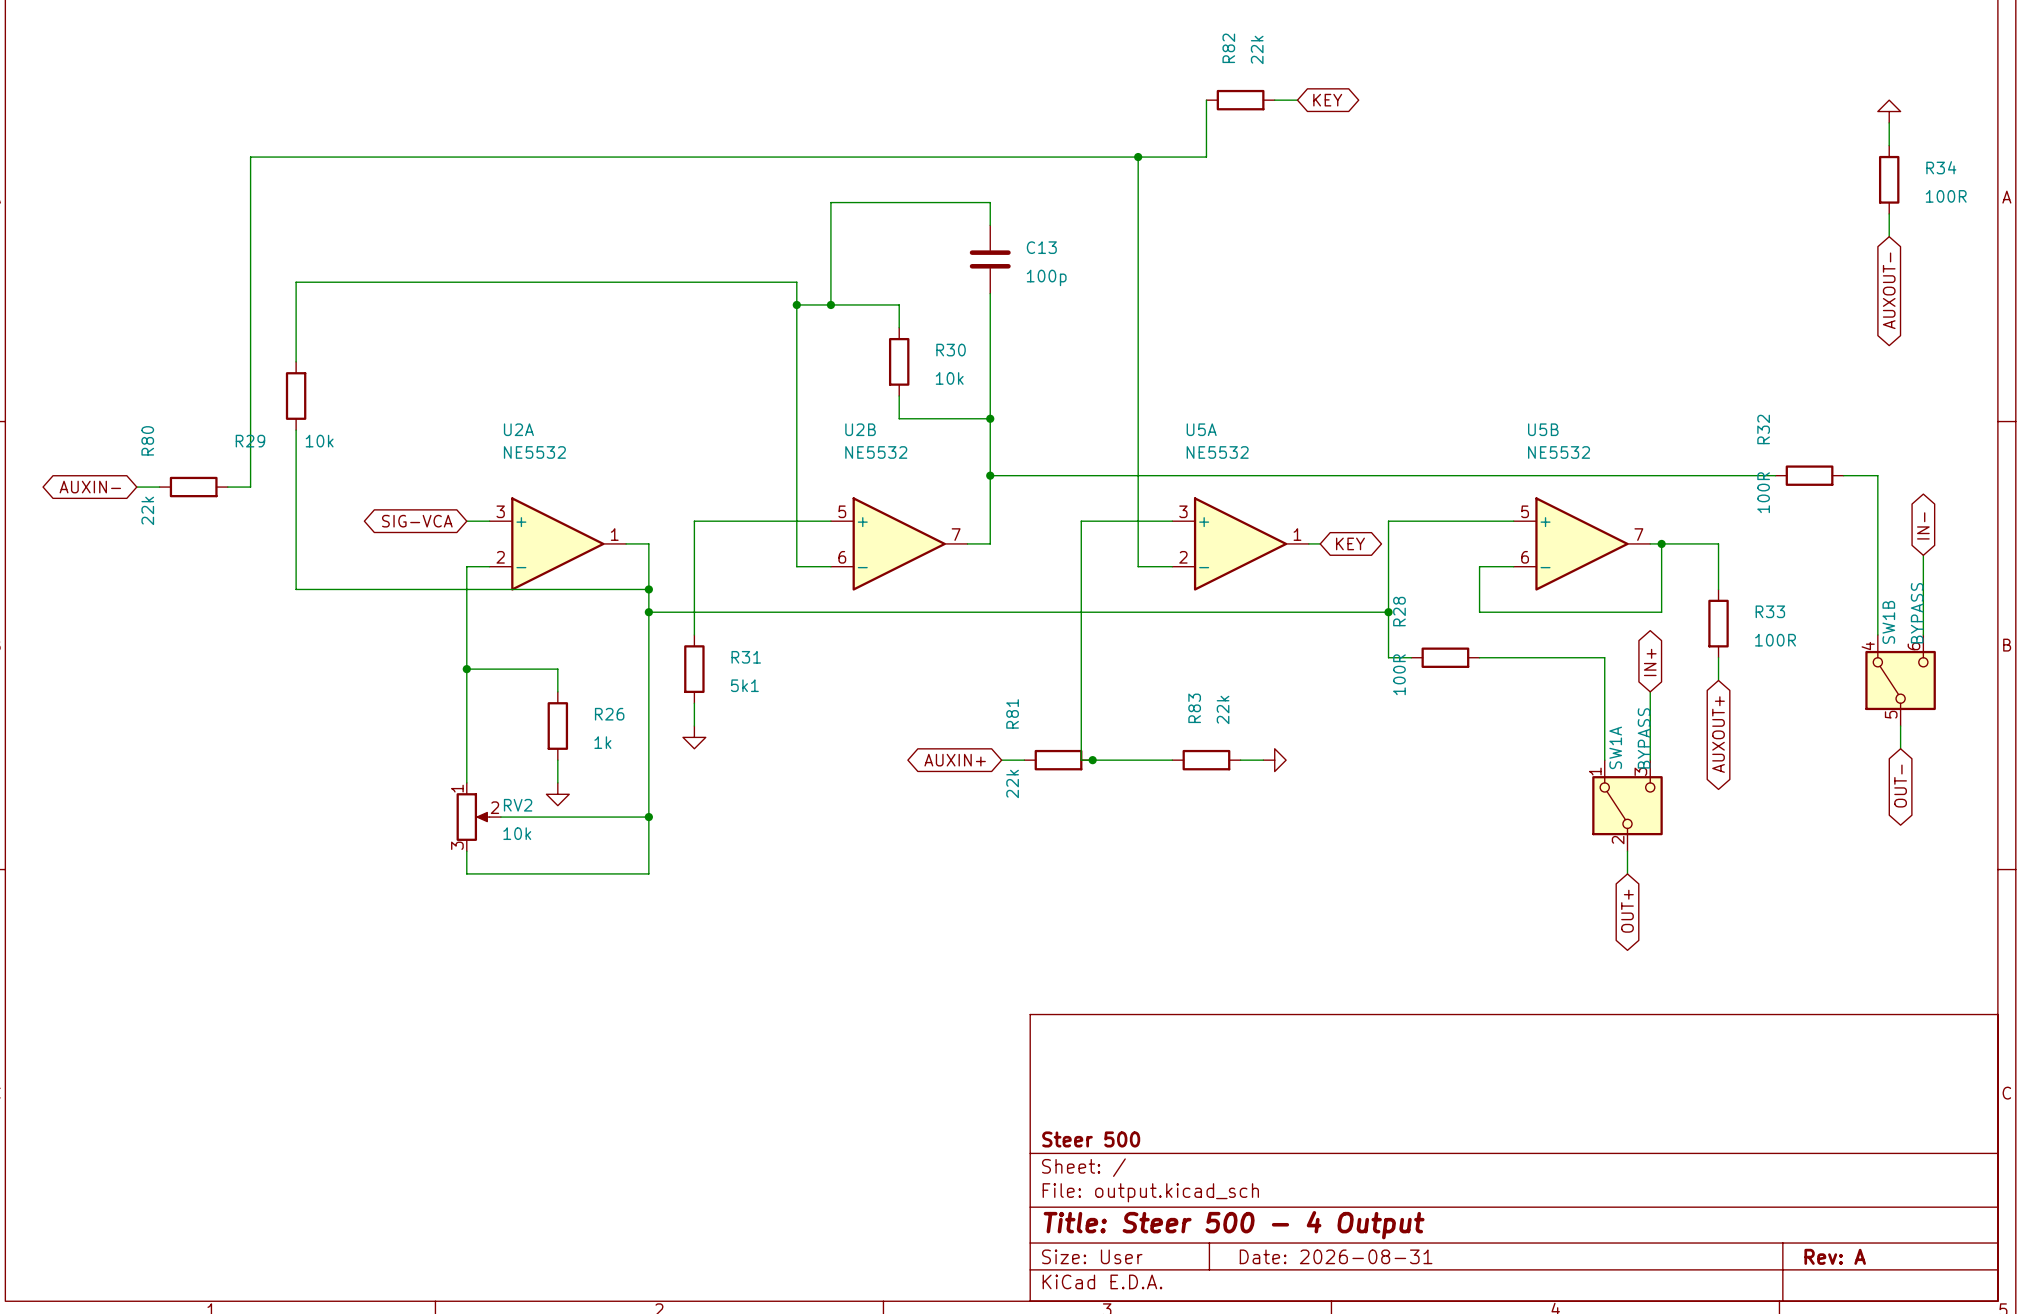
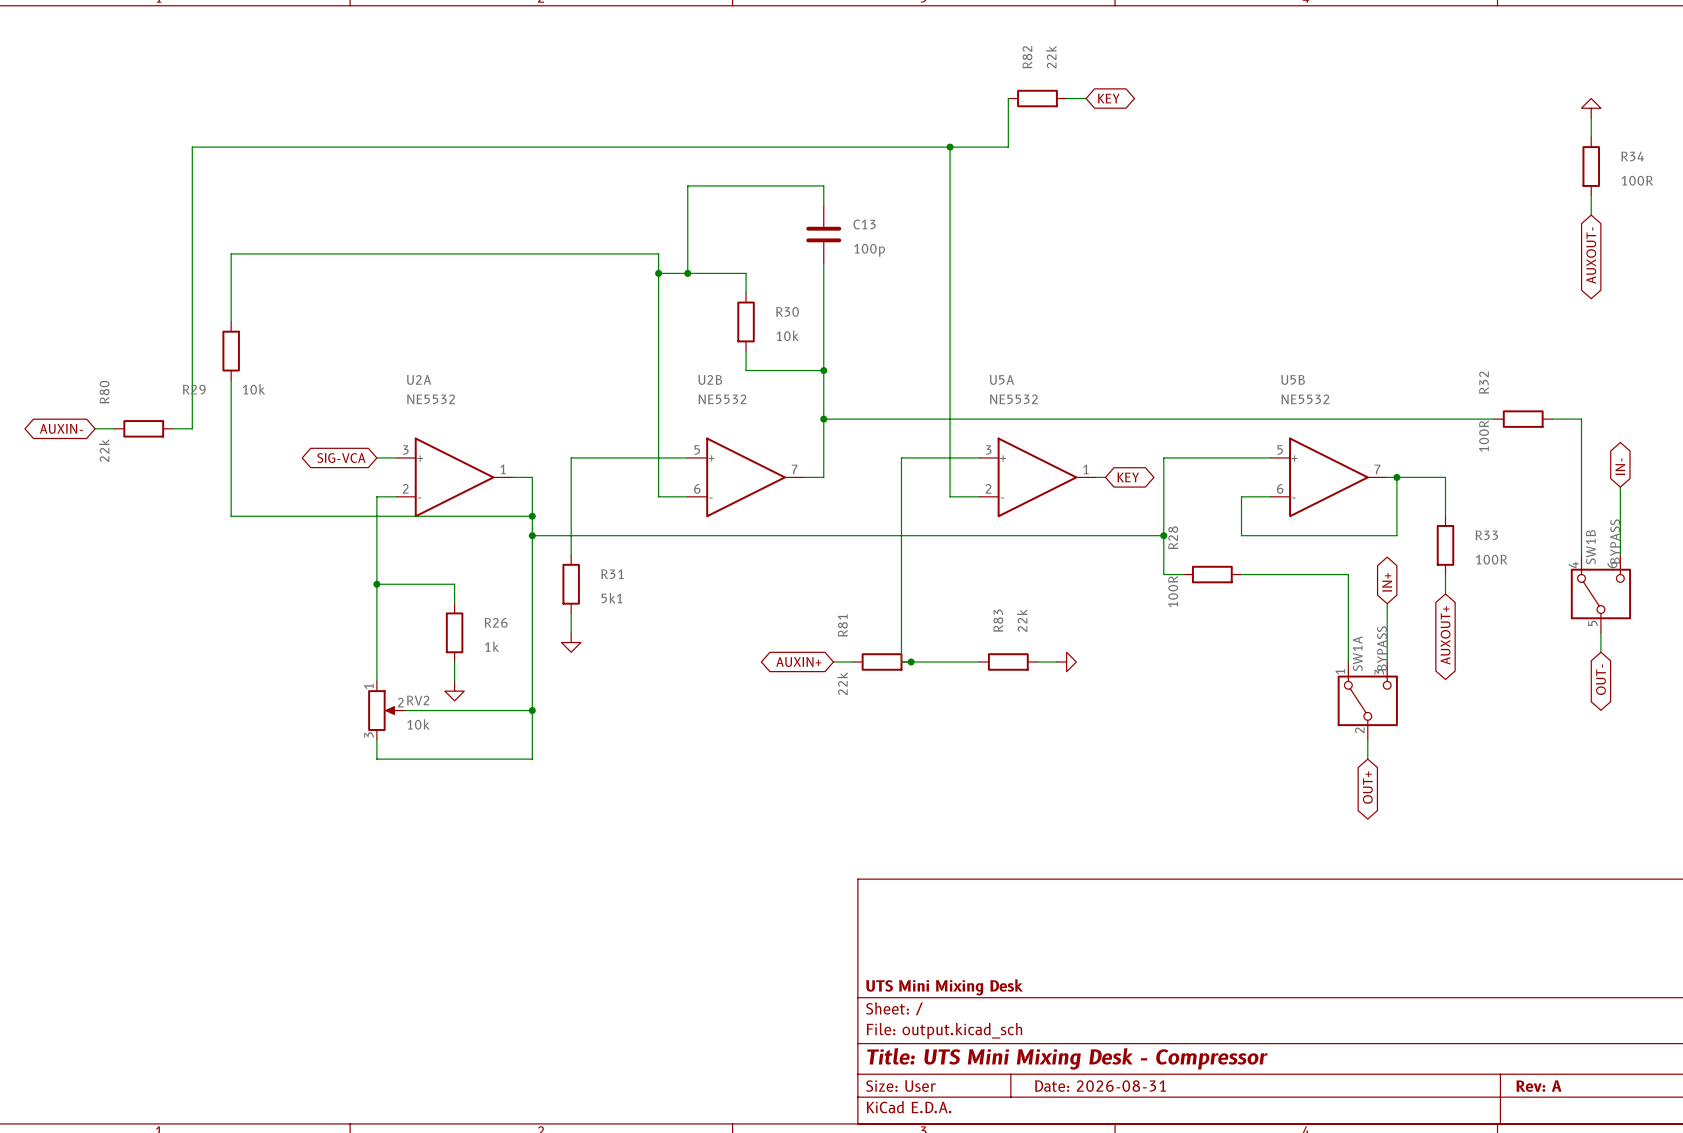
title block: Steer 500 (1091, 1139) -> UTS Mini Mixing Desk (944, 987)
title block: Title: Steer 500 - 4 Output (1234, 1225) -> Title: UTS Mini Mixing Desk - Compressor (1067, 1058)

